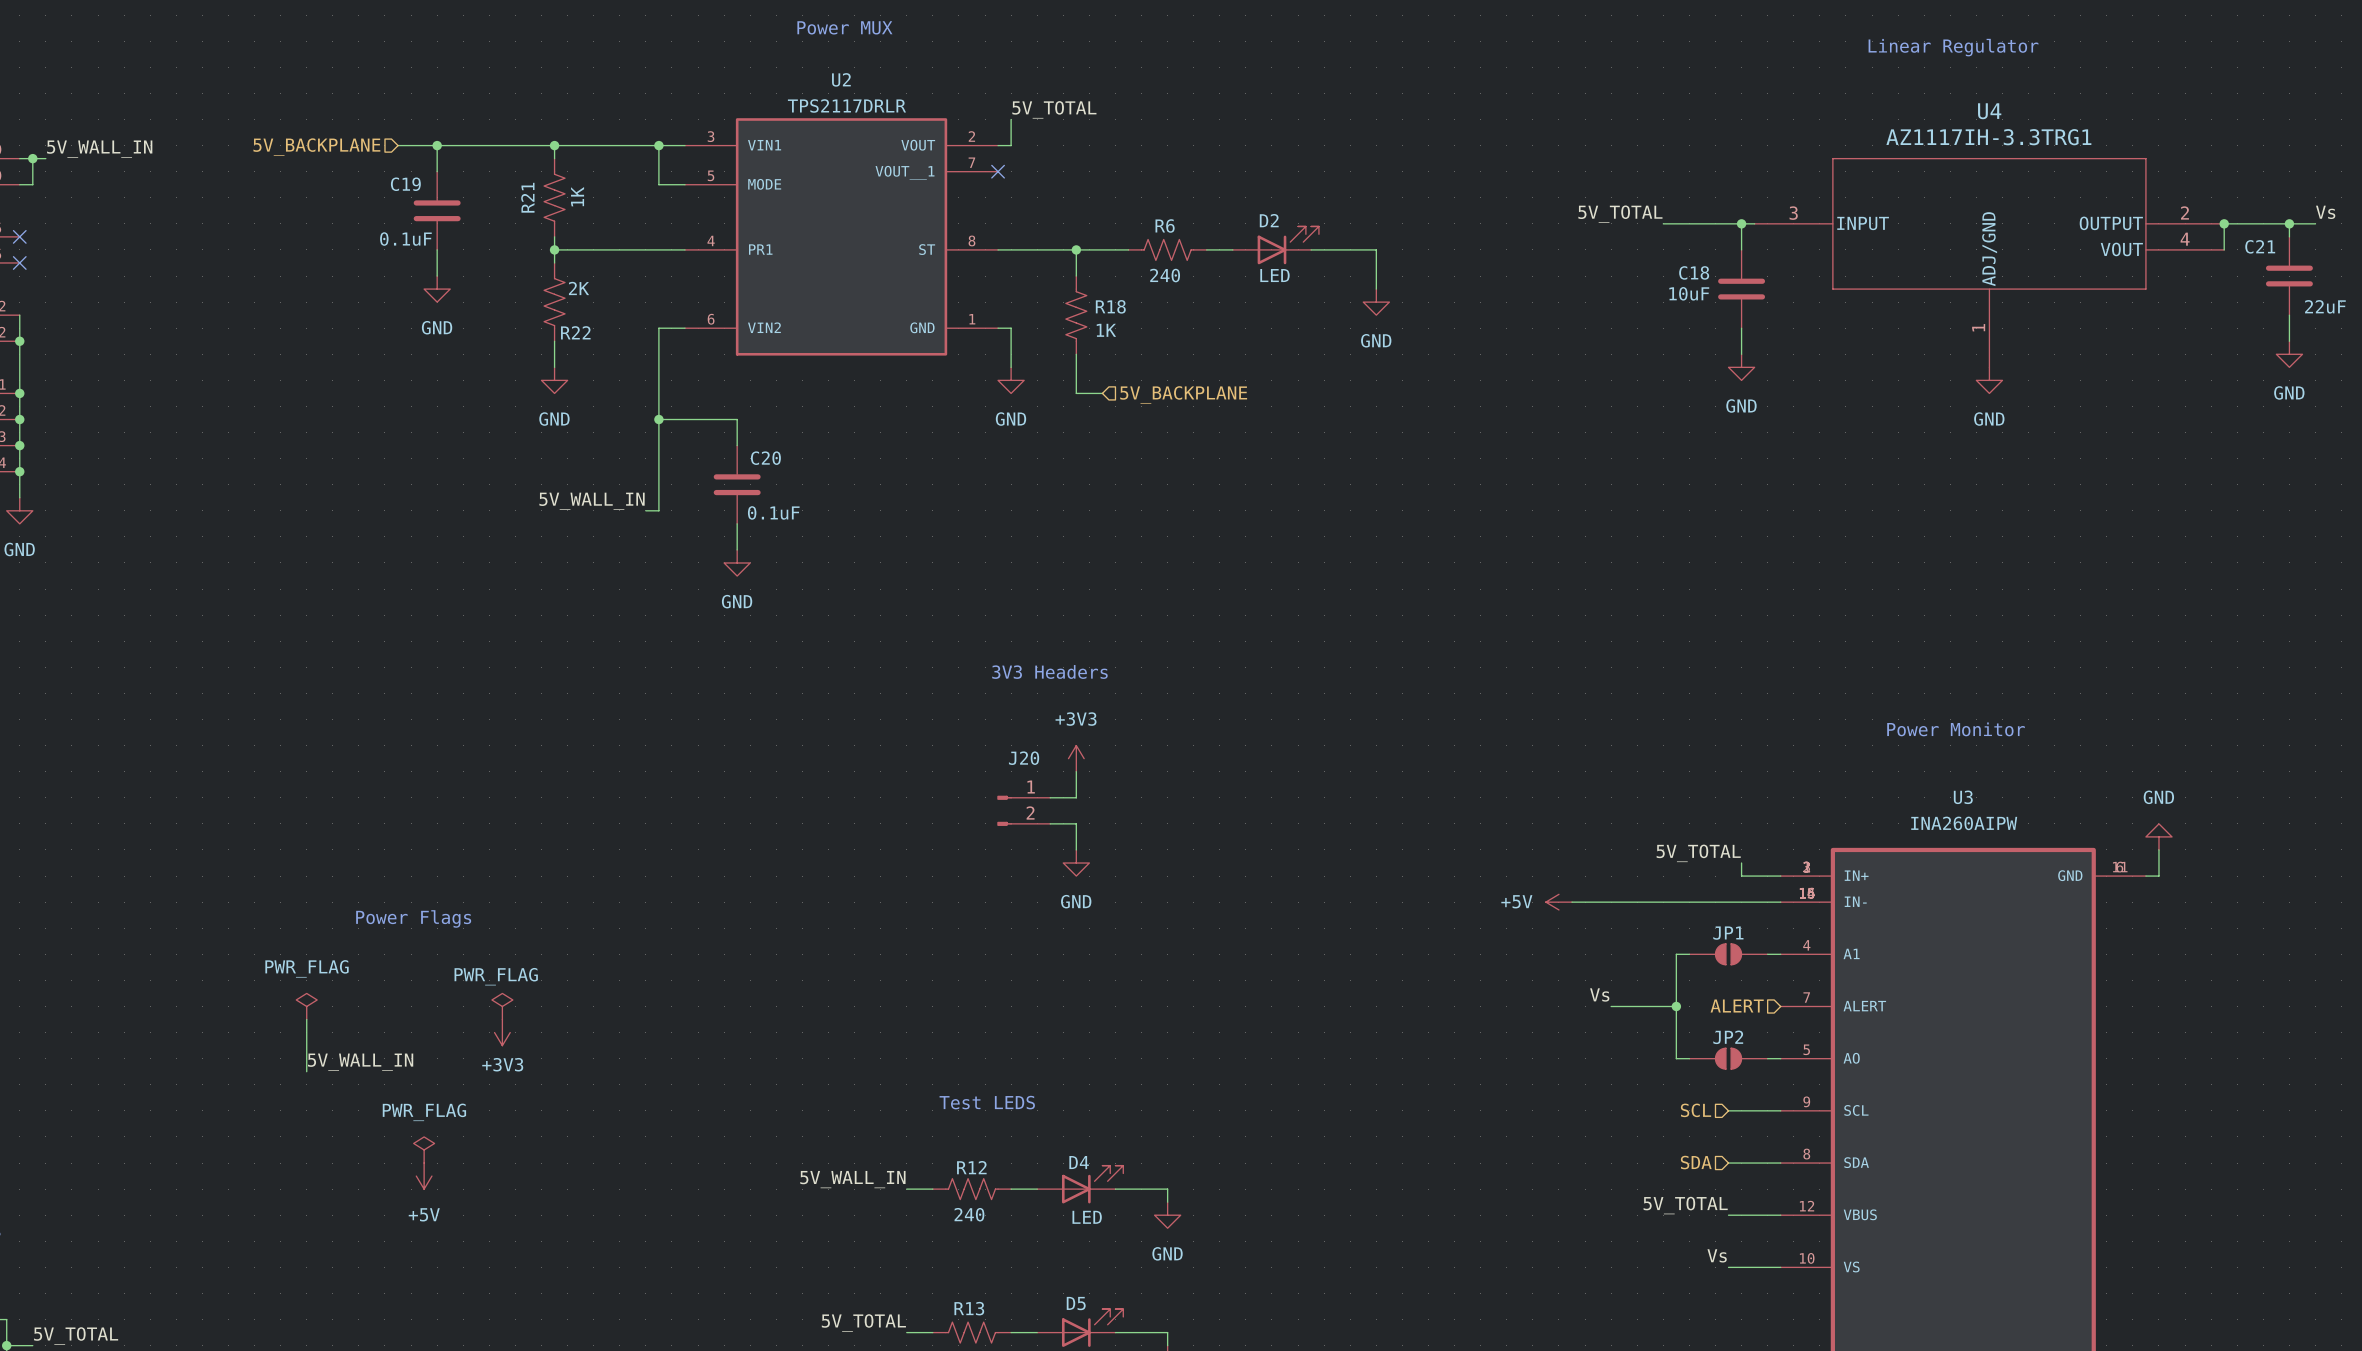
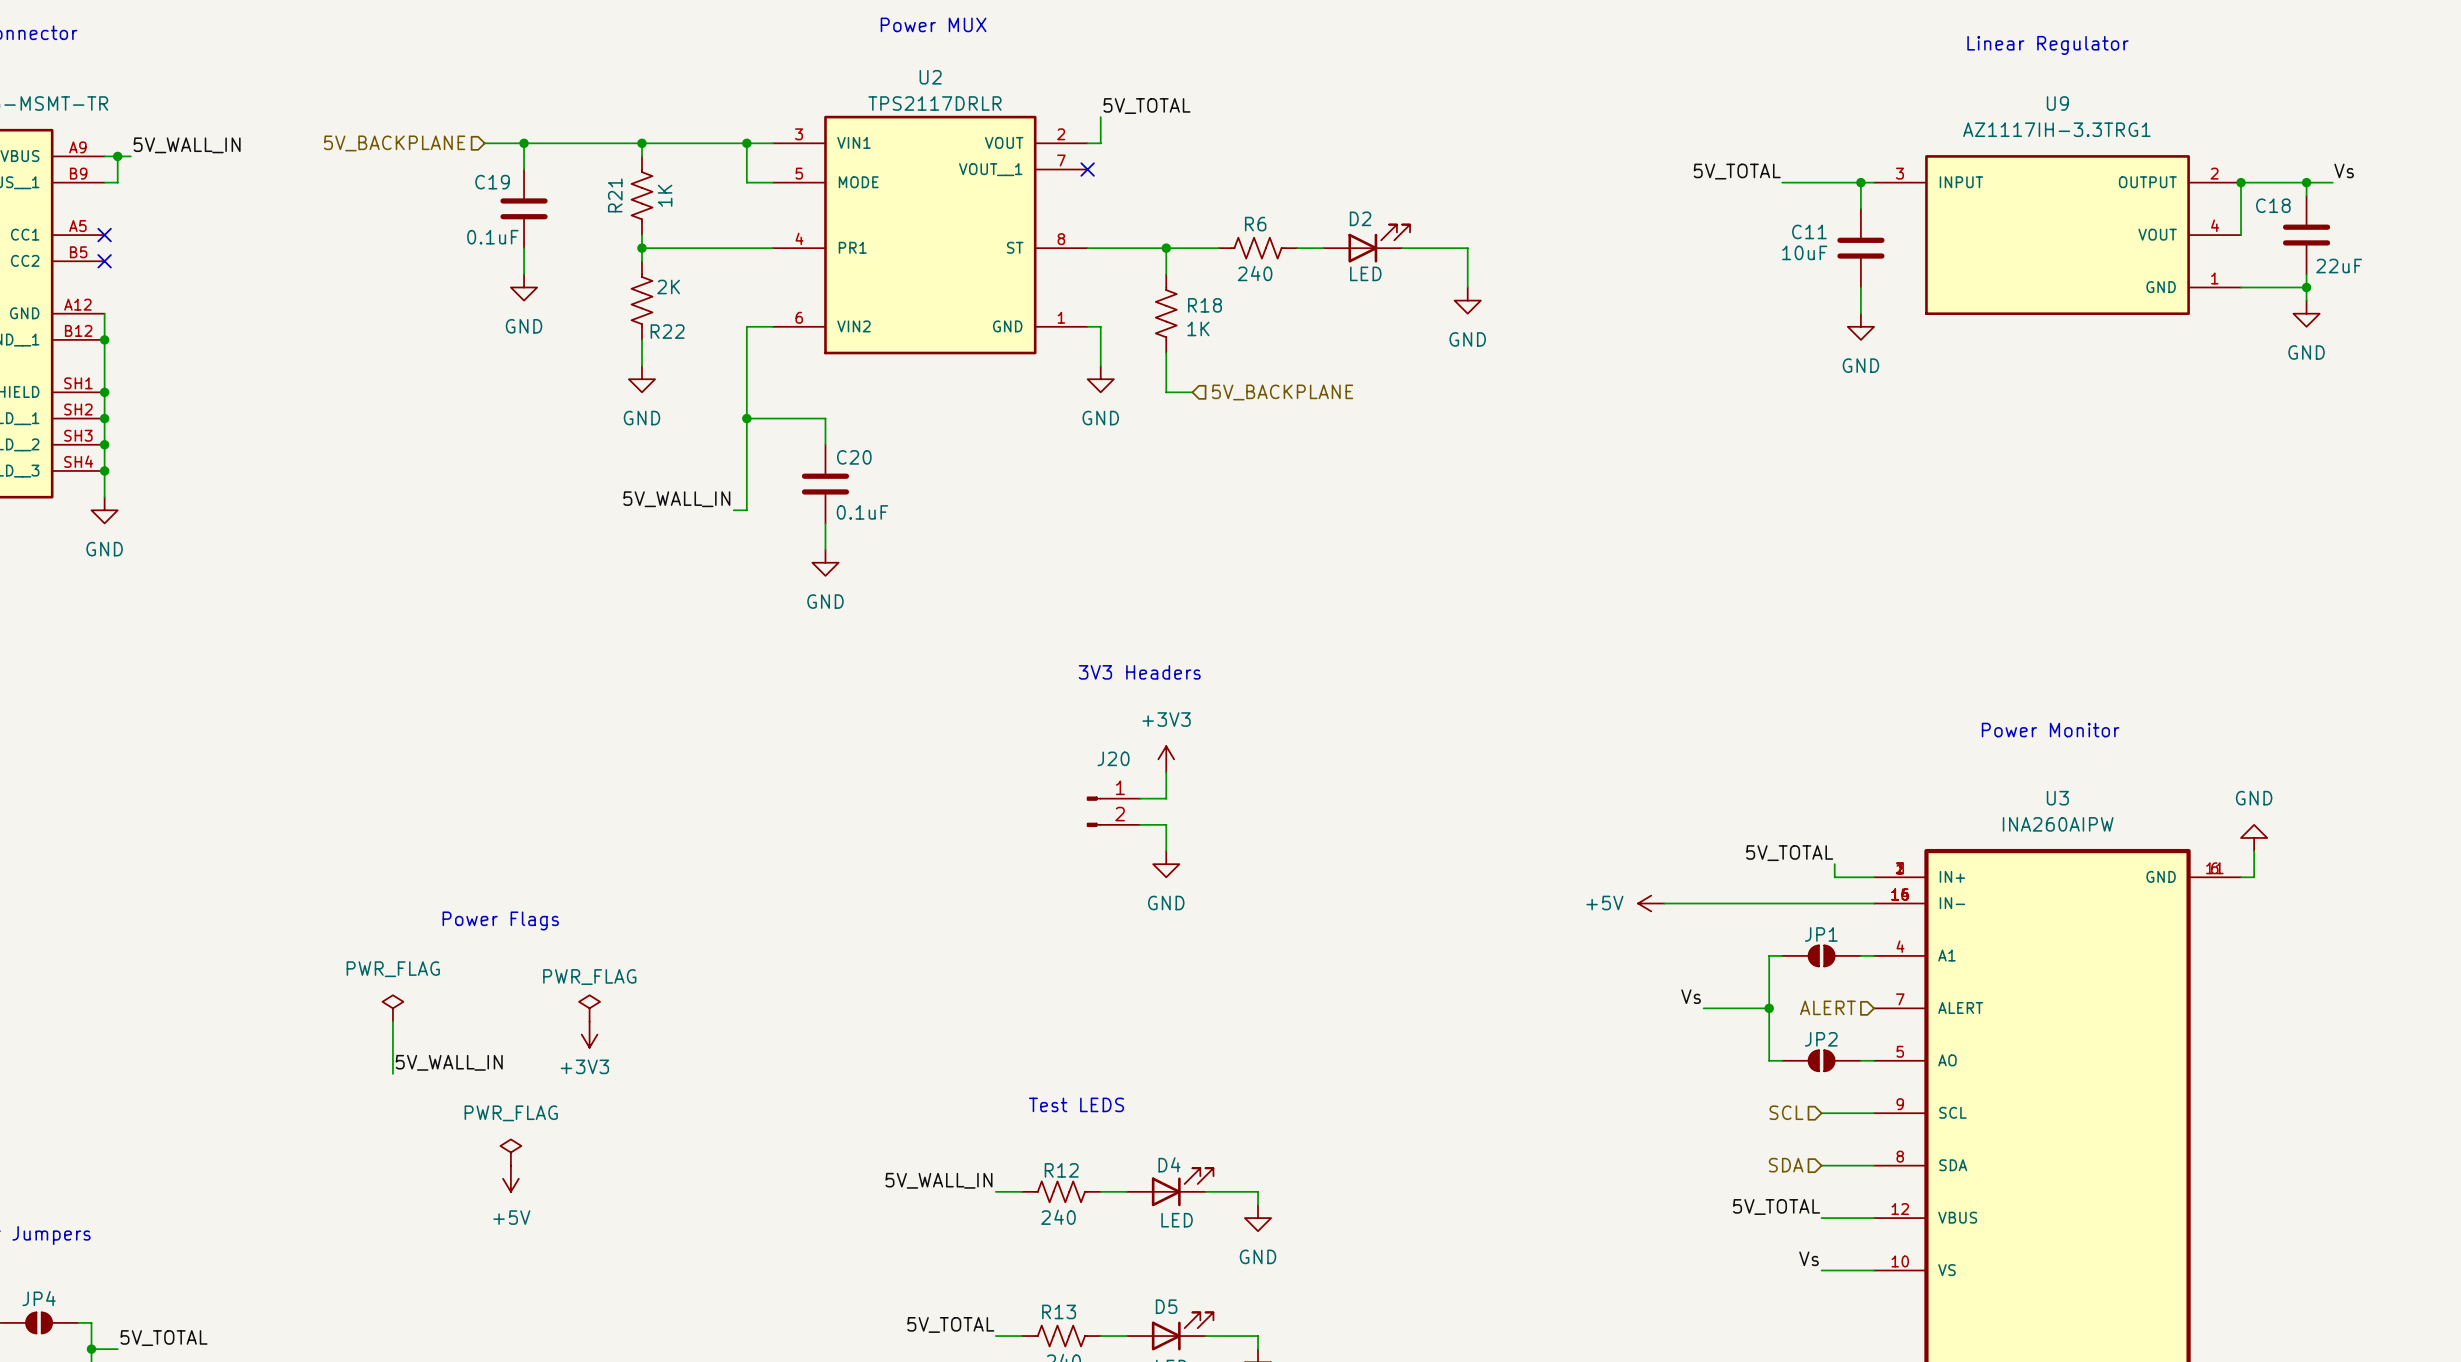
junction: none -> (2241, 182)
junction: none -> (2306, 182)
wire: none -> (2332, 182) (2241, 182) (2241, 235)
label position: Vs (2325, 212) -> Vs (2344, 170)
label position: 5V_TOTAL (1620, 214) -> 5V_TOTAL (1737, 171)
wire: (1663, 223) (1754, 223) -> (1782, 182) (1874, 182)
wire: (1741, 223) (1741, 249) -> (1860, 182) (1860, 208)
junction position: (1741, 223) -> (1860, 182)
junction: (2224, 223) -> none
wire: (2289, 223) (2289, 236) -> (2306, 182) (2306, 195)
junction: (2289, 223) -> none
wire: (2315, 223) (2224, 223) (2224, 249) -> none
U9: none -> AZ1117IH-3.3TRG1 (2057, 235)
C11: none -> 10uF (1860, 248)
U4: AZ1117IH-3.3TRG1 (1989, 262) -> none
C18 name position: C18 (1694, 272) -> C18 (2273, 205)
C21: 22uF (2289, 276) -> none
C18 position: (1741, 289) -> (2306, 235)
wire: none -> (2241, 287) (2306, 287)
junction: none -> (2306, 287)
C18 value: 10uF (1689, 293) -> 22uF (2339, 266)
wire: (2289, 315) (2289, 341) -> (2306, 274) (2306, 300)
wire: (1741, 328) (1741, 354) -> (1860, 287) (1860, 313)
power symbol position: GND (2289, 354) -> GND (2306, 313)
power symbol position: GND (1741, 367) -> GND (1860, 326)
power symbol: GND (1989, 380) -> none

